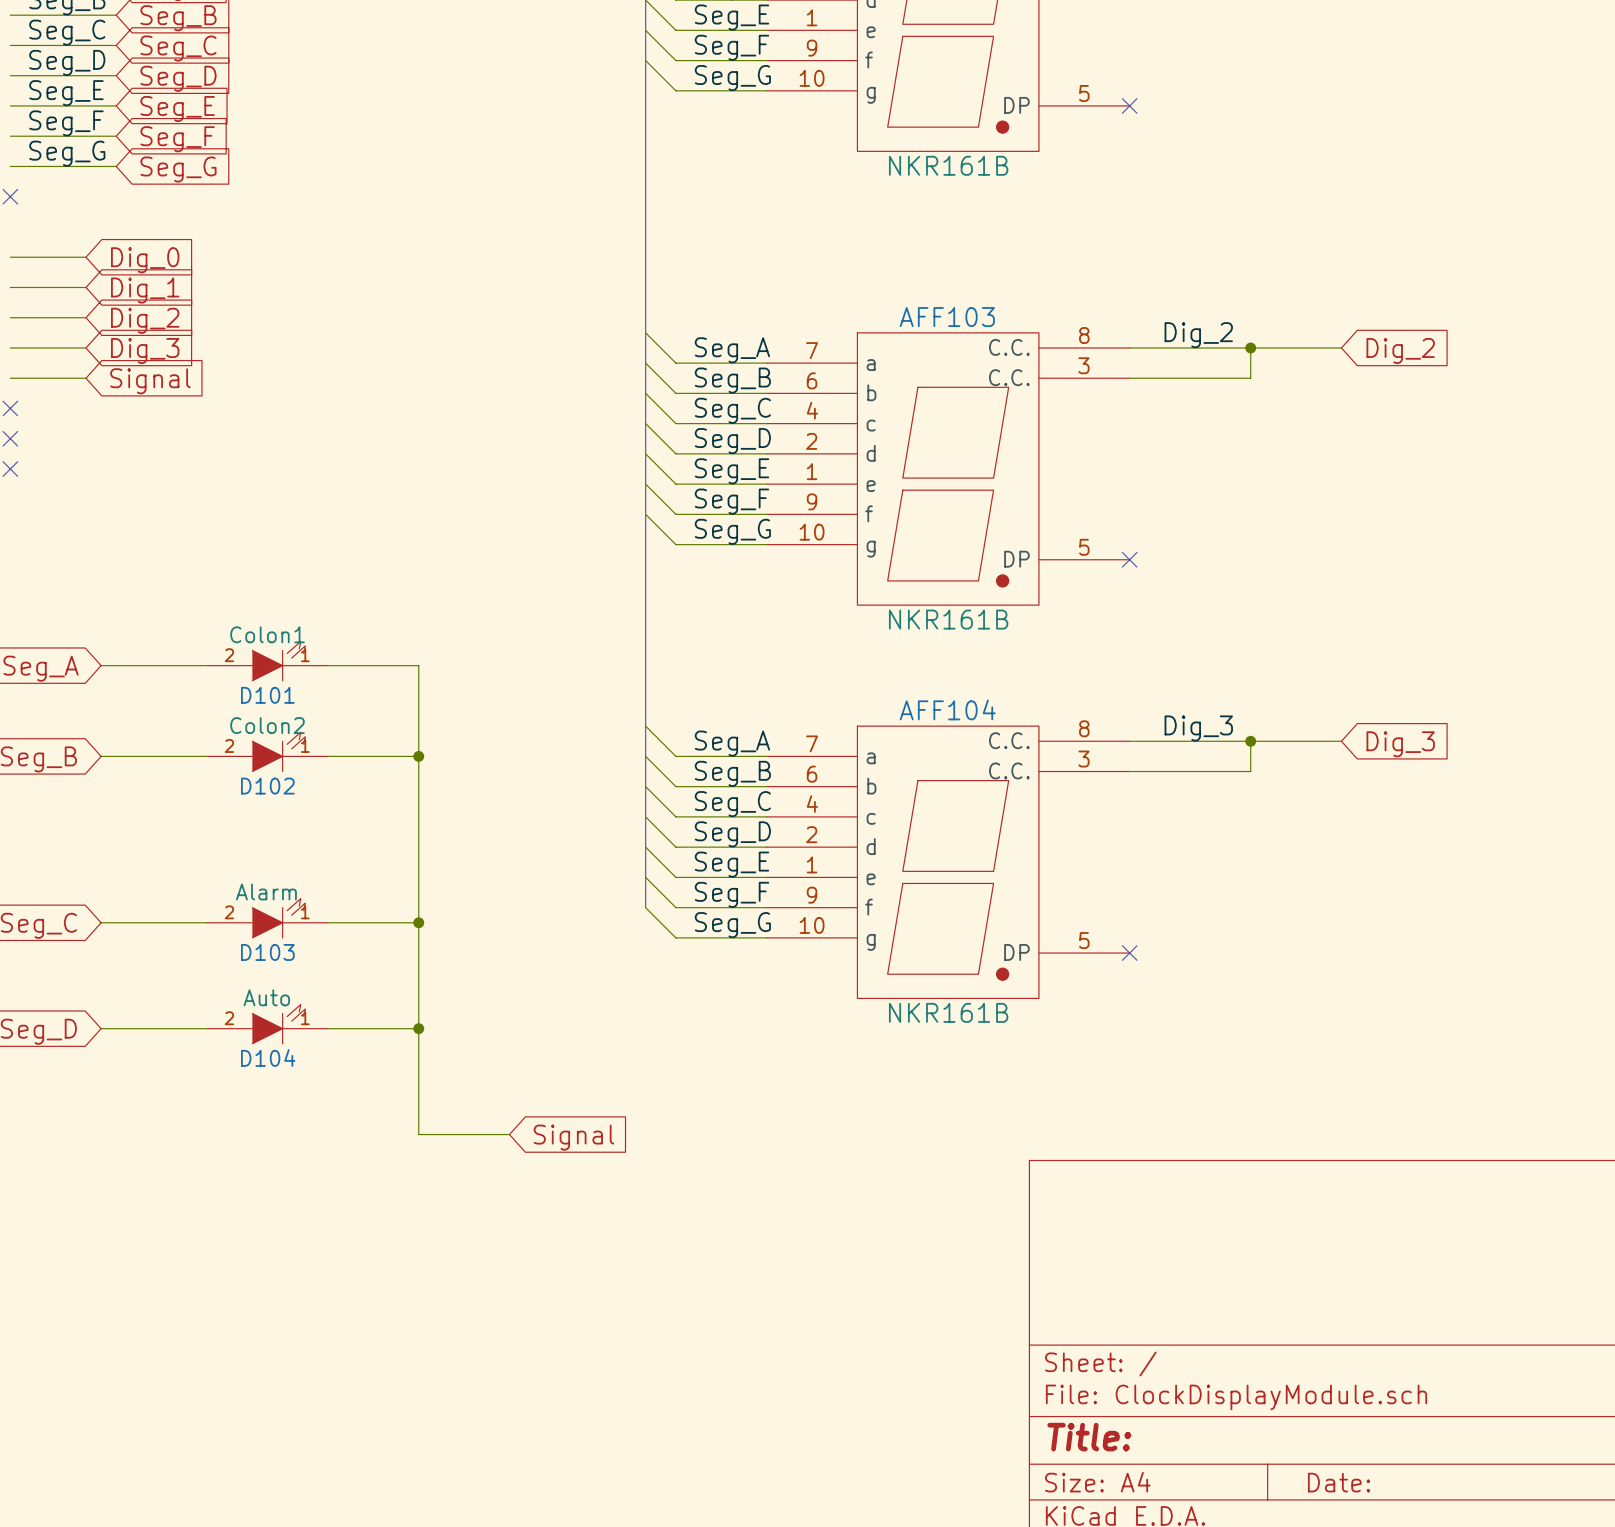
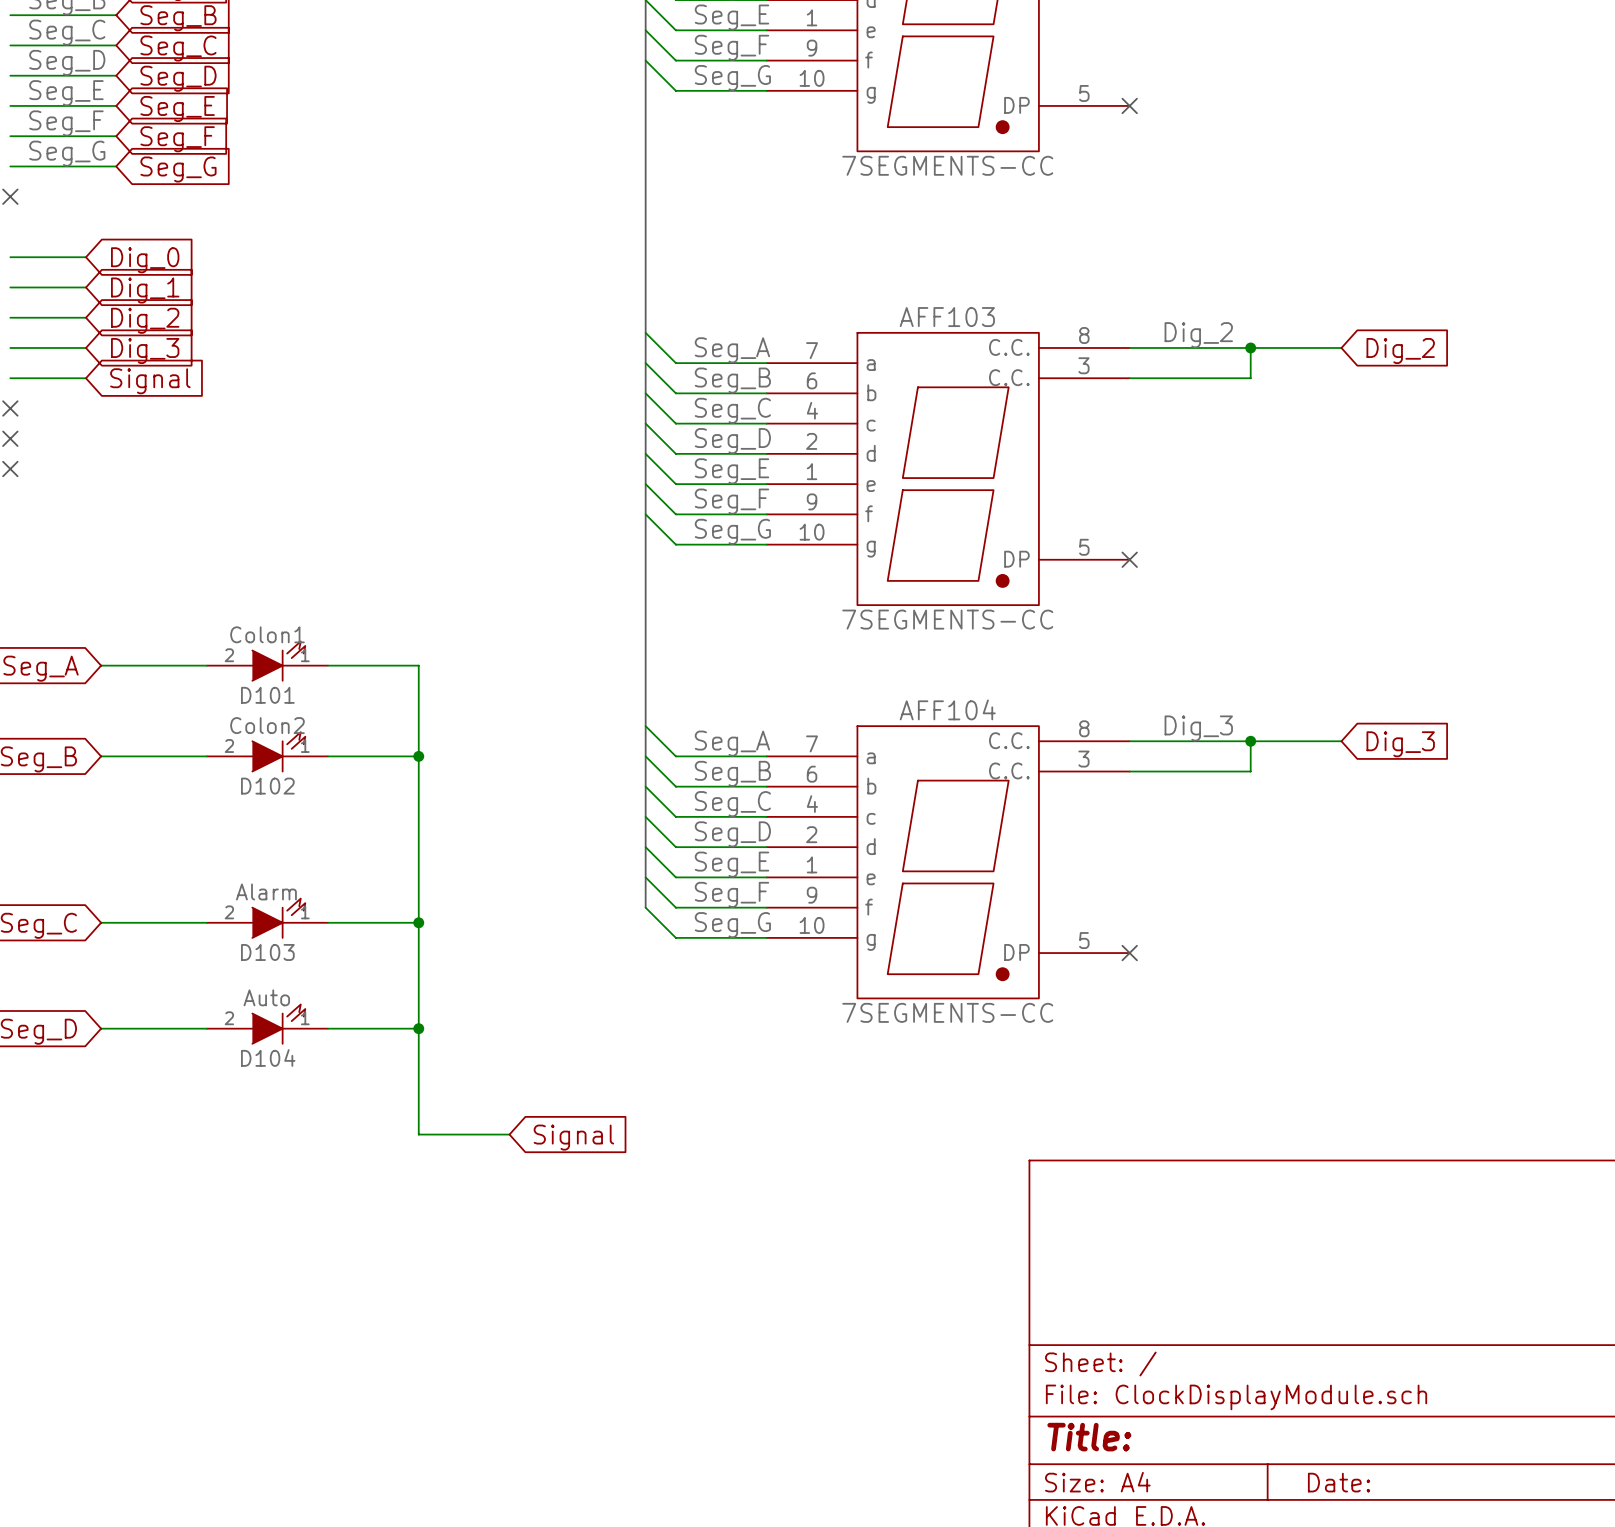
part value: NKR161B (948, 165) -> 7SEGMENTS-CC (947, 165)
AFF103 value: NKR161B (948, 619) -> 7SEGMENTS-CC (947, 619)
AFF104 value: NKR161B (948, 1012) -> 7SEGMENTS-CC (947, 1012)

